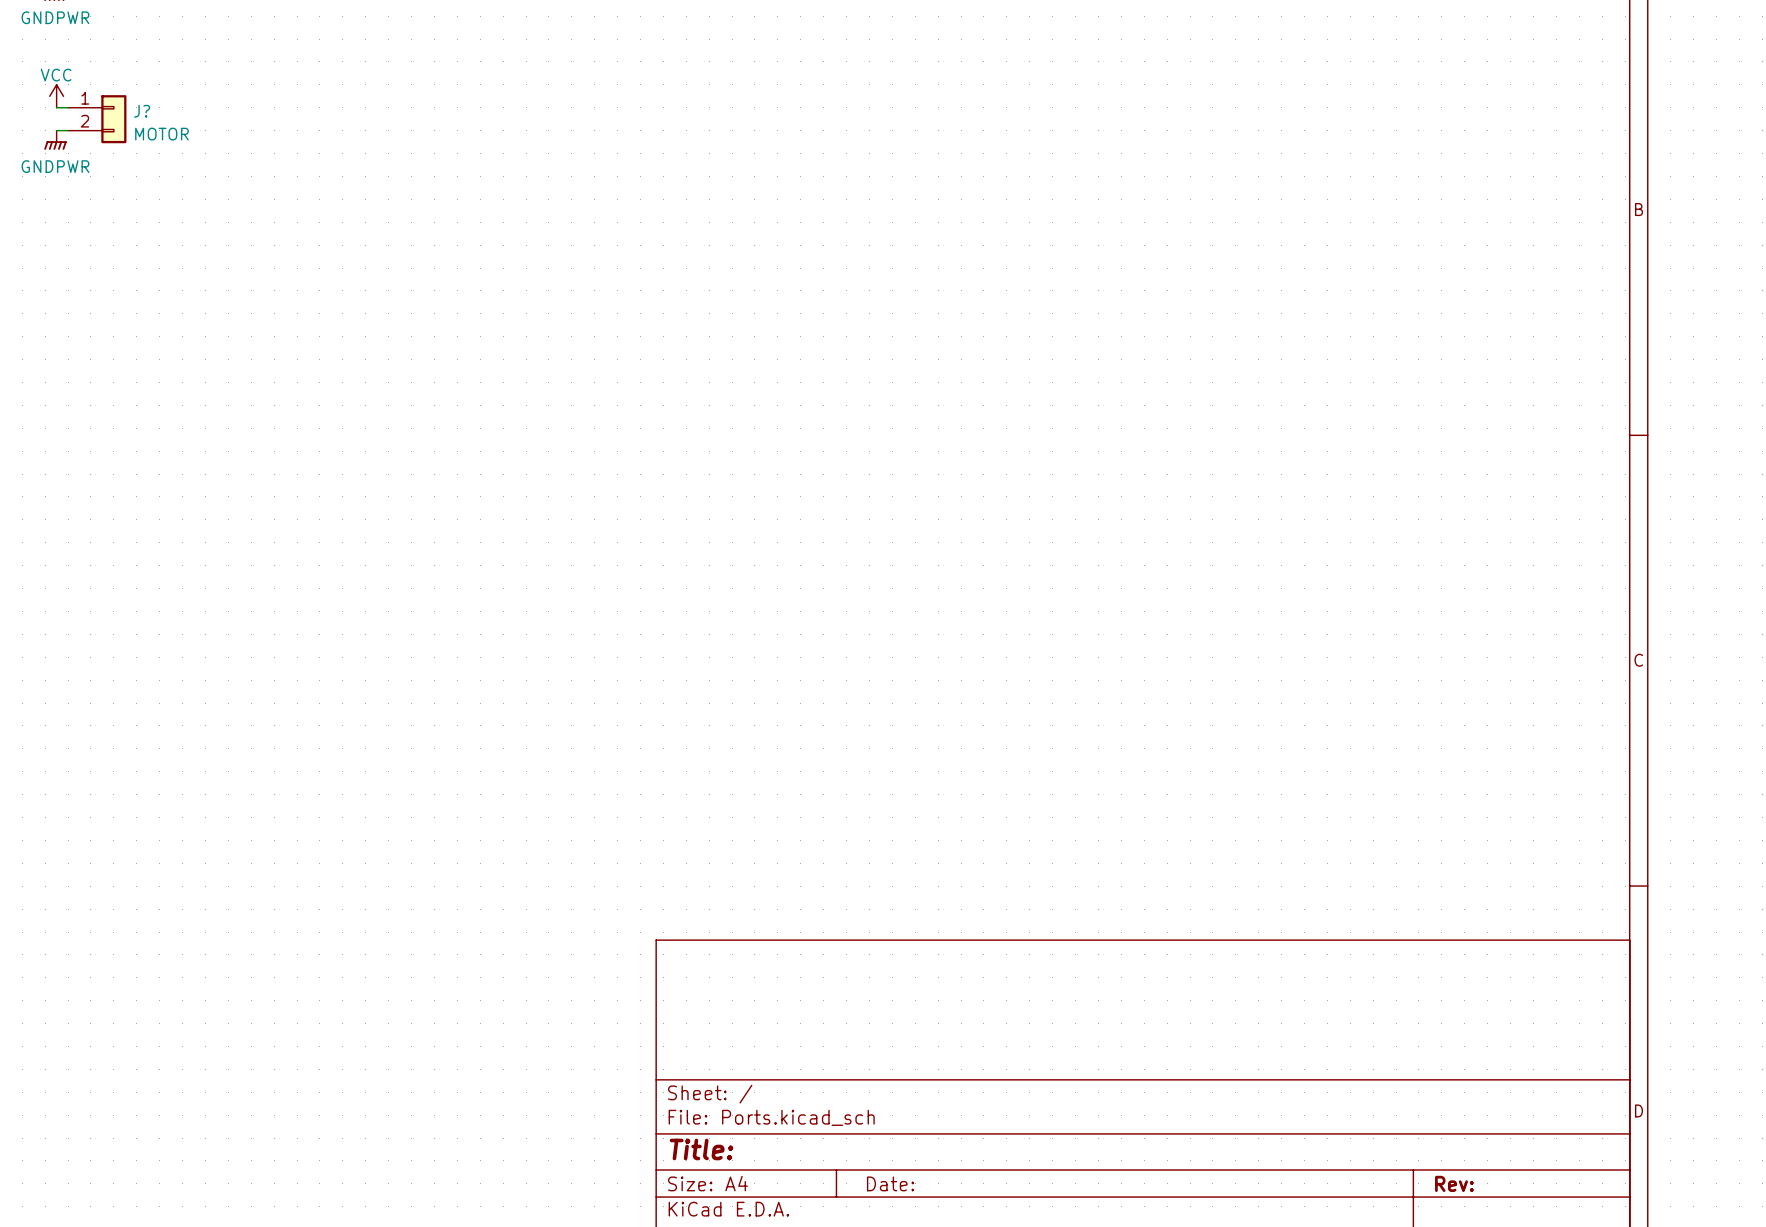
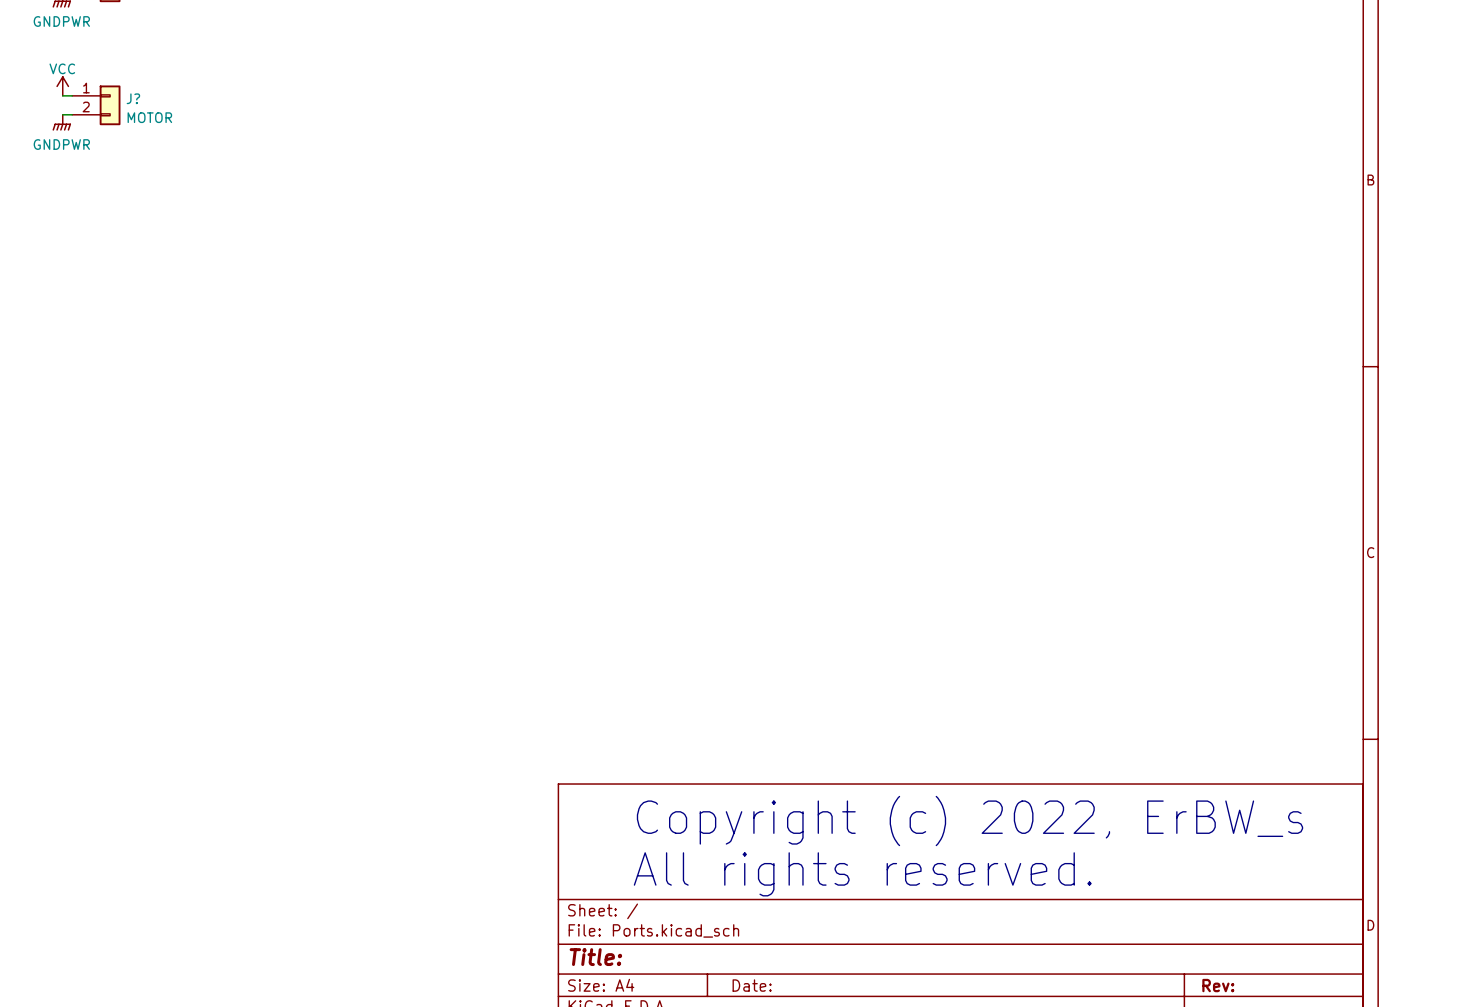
text: none -> Copyright (c) 2022, ErBW_s (970, 821)
text: none -> All rights reserved. (862, 874)

